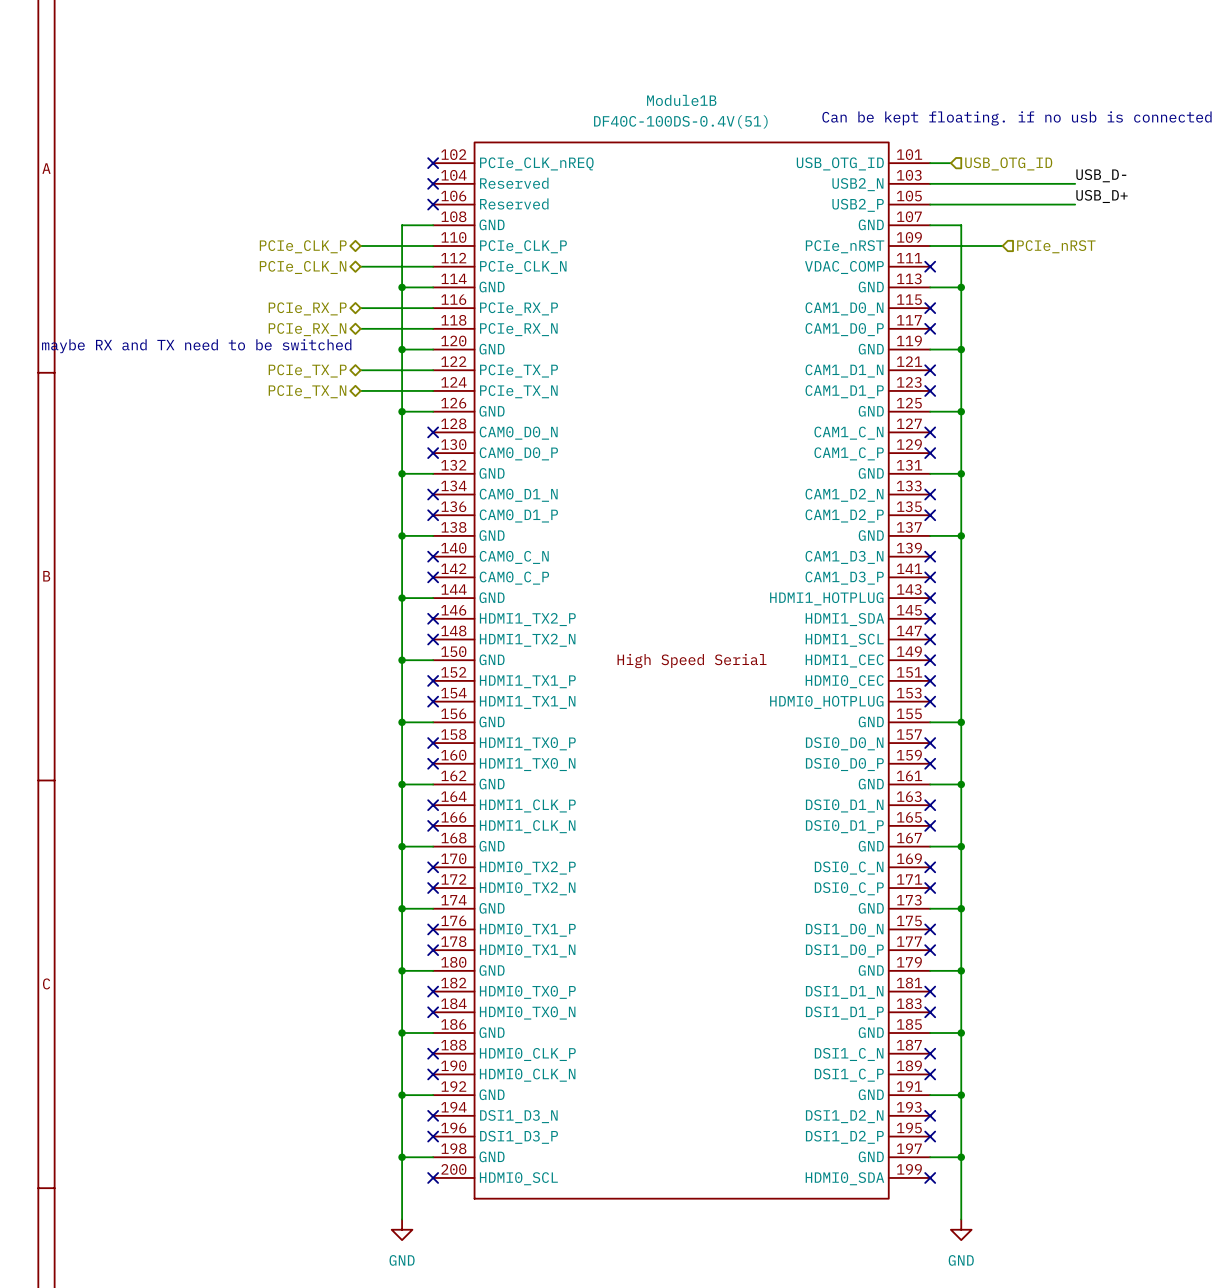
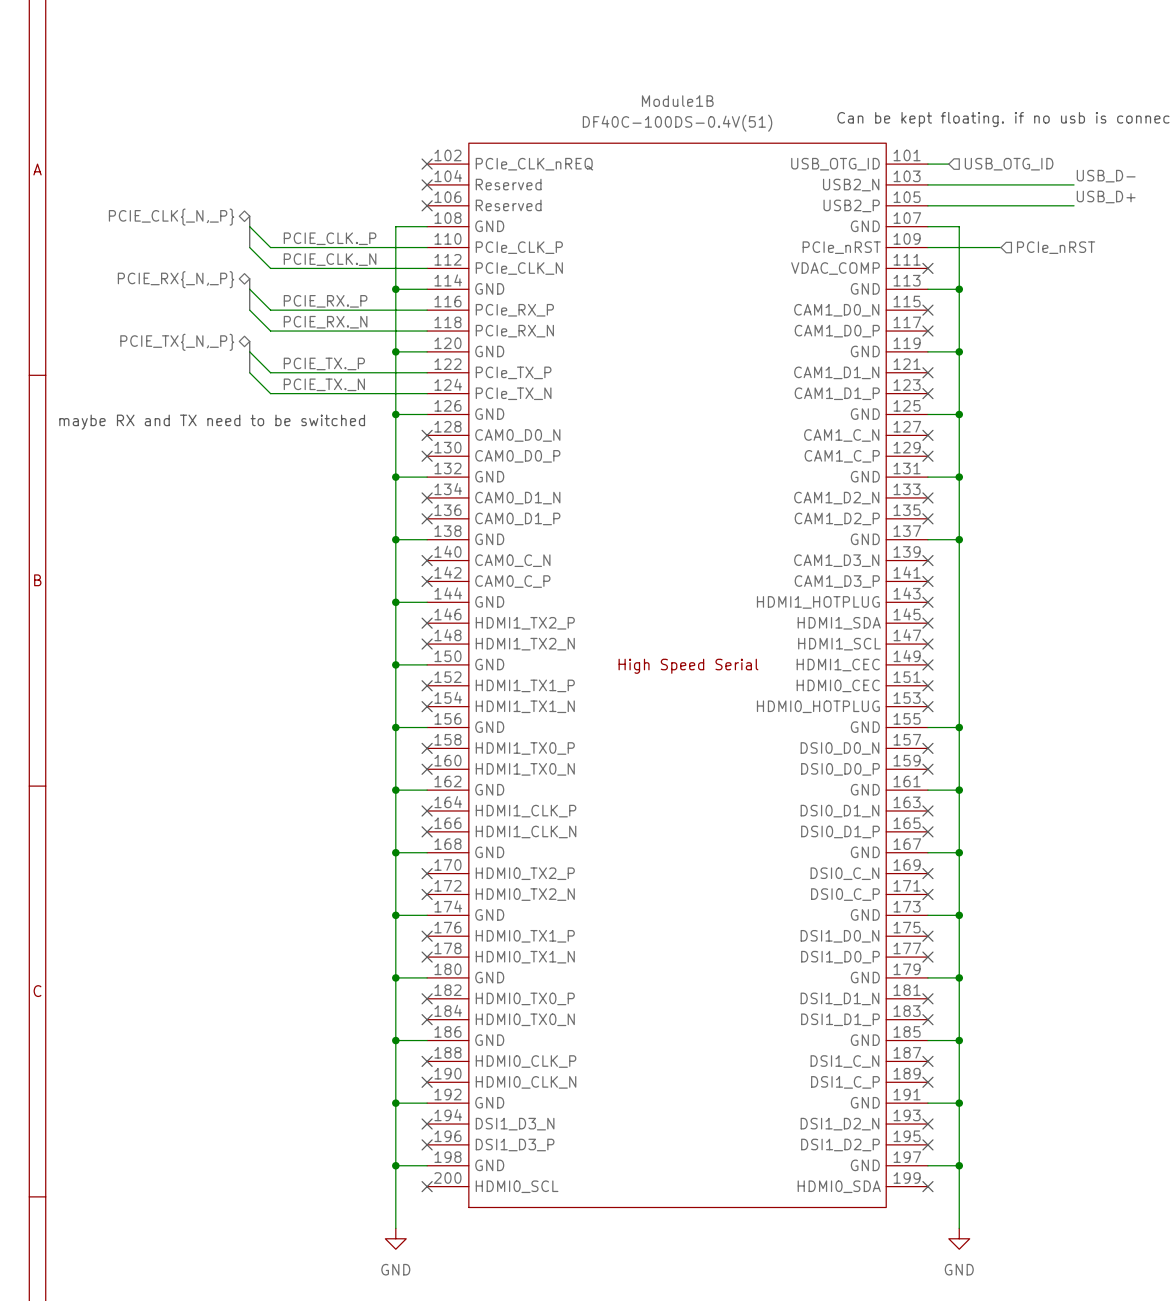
bus: none -> (249, 216) (249, 247)
hierarchical label: none -> PCIE_CLK{_N,_P} (171, 217)
wire: none -> (249, 226) (270, 247) (354, 247)
label: none -> PCIE_CLK._P (330, 238)
wire: none -> (249, 247) (270, 268) (354, 268)
hierarchical label: PCIe_CLK_P (303, 246) -> none
label: none -> PCIE_CLK._N (330, 259)
hierarchical label: PCIe_CLK_N (303, 267) -> none
hierarchical label: none -> PCIE_RX{_N,_P} (176, 279)
bus: none -> (249, 278) (249, 310)
wire: none -> (249, 289) (270, 310) (354, 310)
label: none -> PCIE_RX._P (325, 301)
wire: none -> (249, 310) (270, 331) (354, 331)
hierarchical label: PCIe_RX_P (307, 308) -> none
label: none -> PCIE_RX._N (325, 322)
hierarchical label: PCIe_RX_N (307, 329) -> none
hierarchical label: none -> PCIE_TX{_N,_P} (177, 342)
bus: none -> (249, 341) (249, 372)
text position: maybe RX and TX need to be switched (196, 346) -> maybe RX and TX need to be switched (212, 422)
wire: none -> (249, 351) (270, 372) (354, 372)
label: none -> PCIE_TX._P (324, 363)
wire: none -> (249, 372) (270, 393) (354, 393)
hierarchical label: PCIe_TX_P (307, 371) -> none
label: none -> PCIE_TX._N (324, 384)
hierarchical label: PCIe_TX_N (307, 391) -> none

